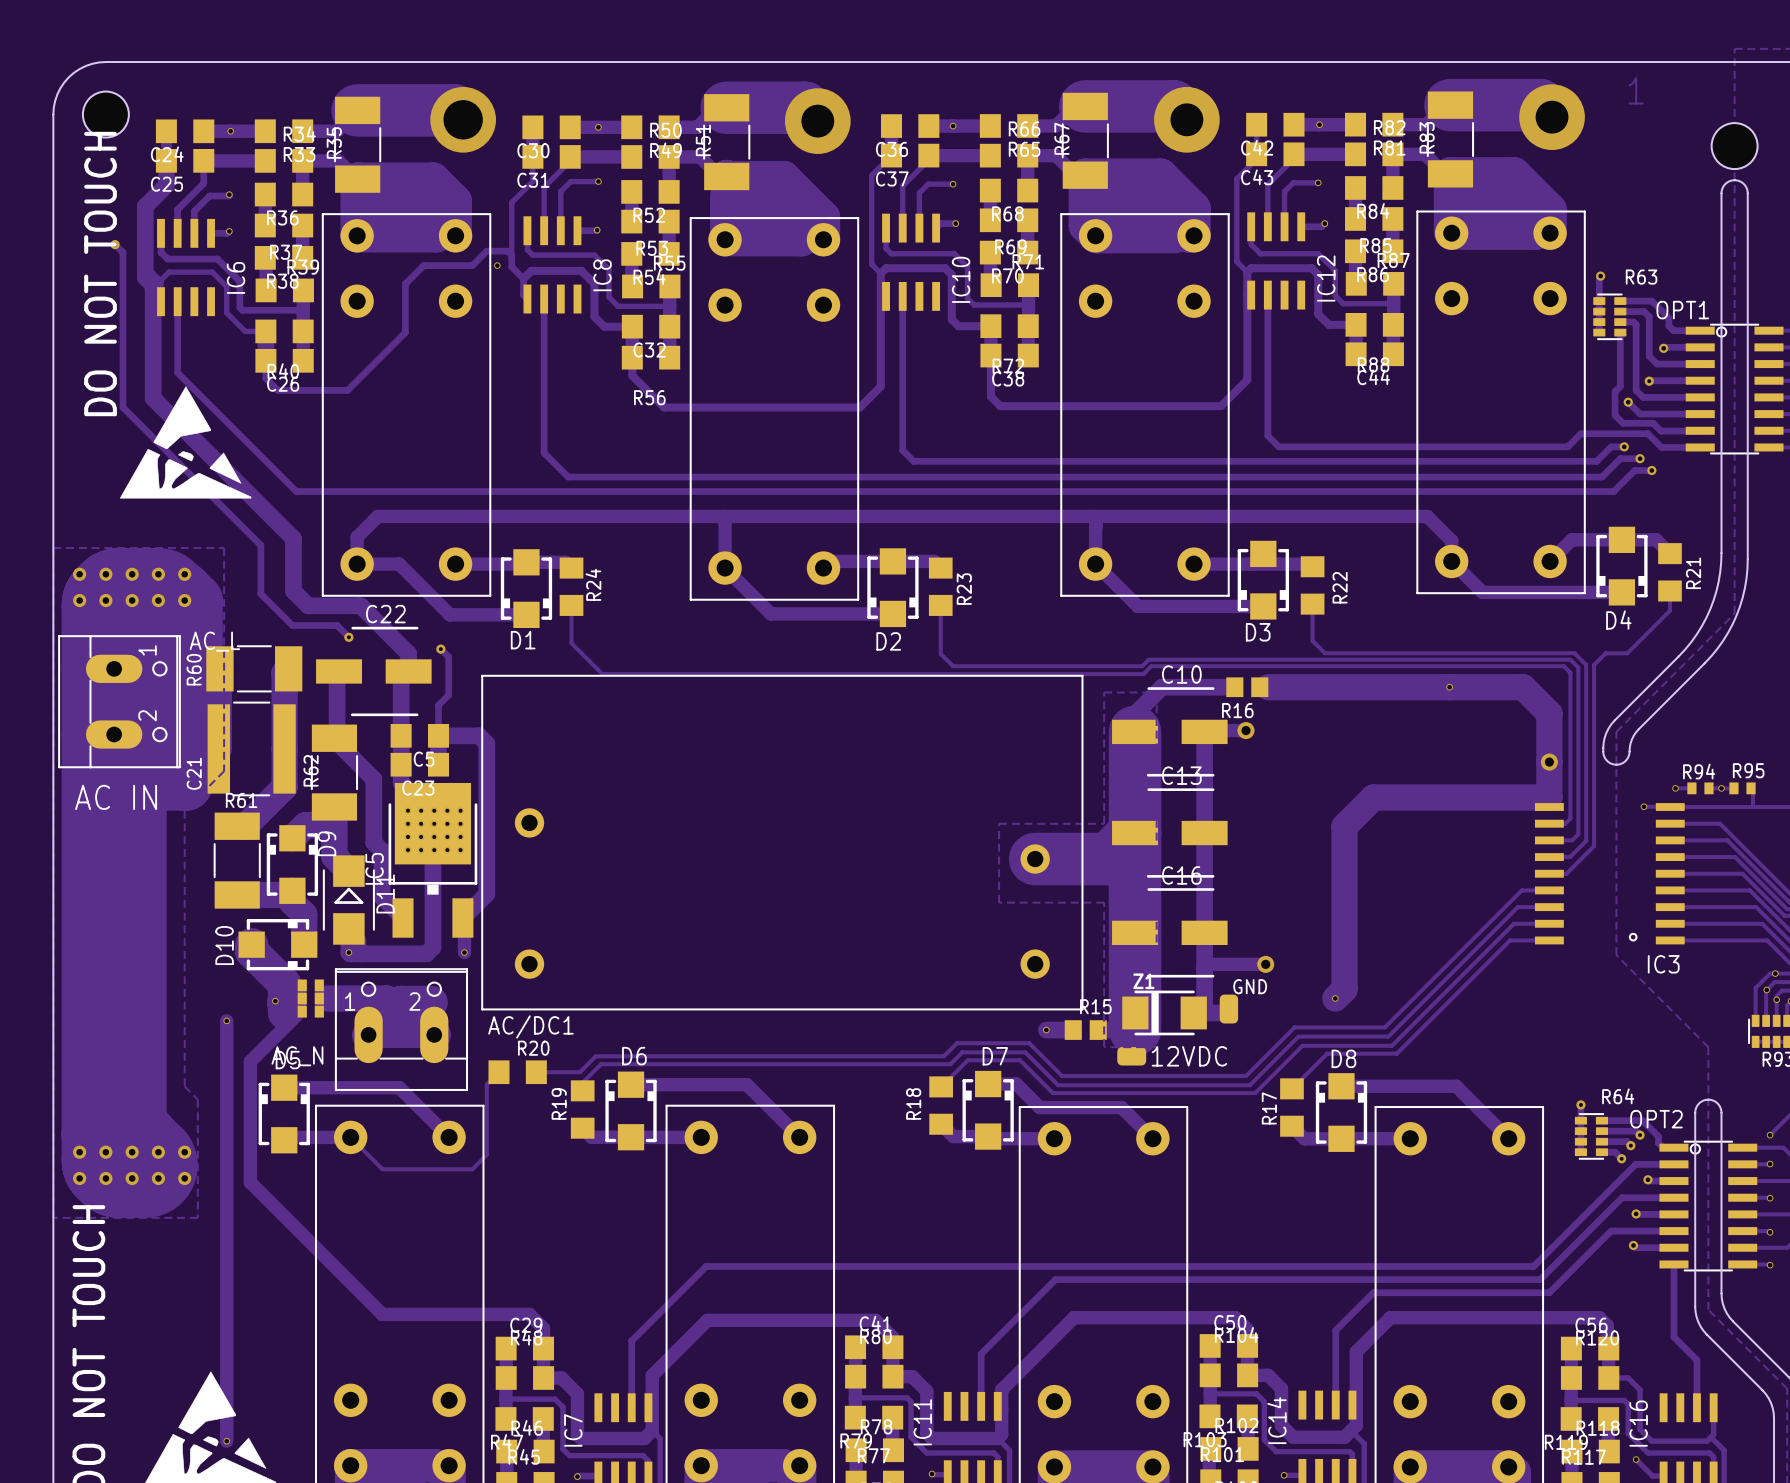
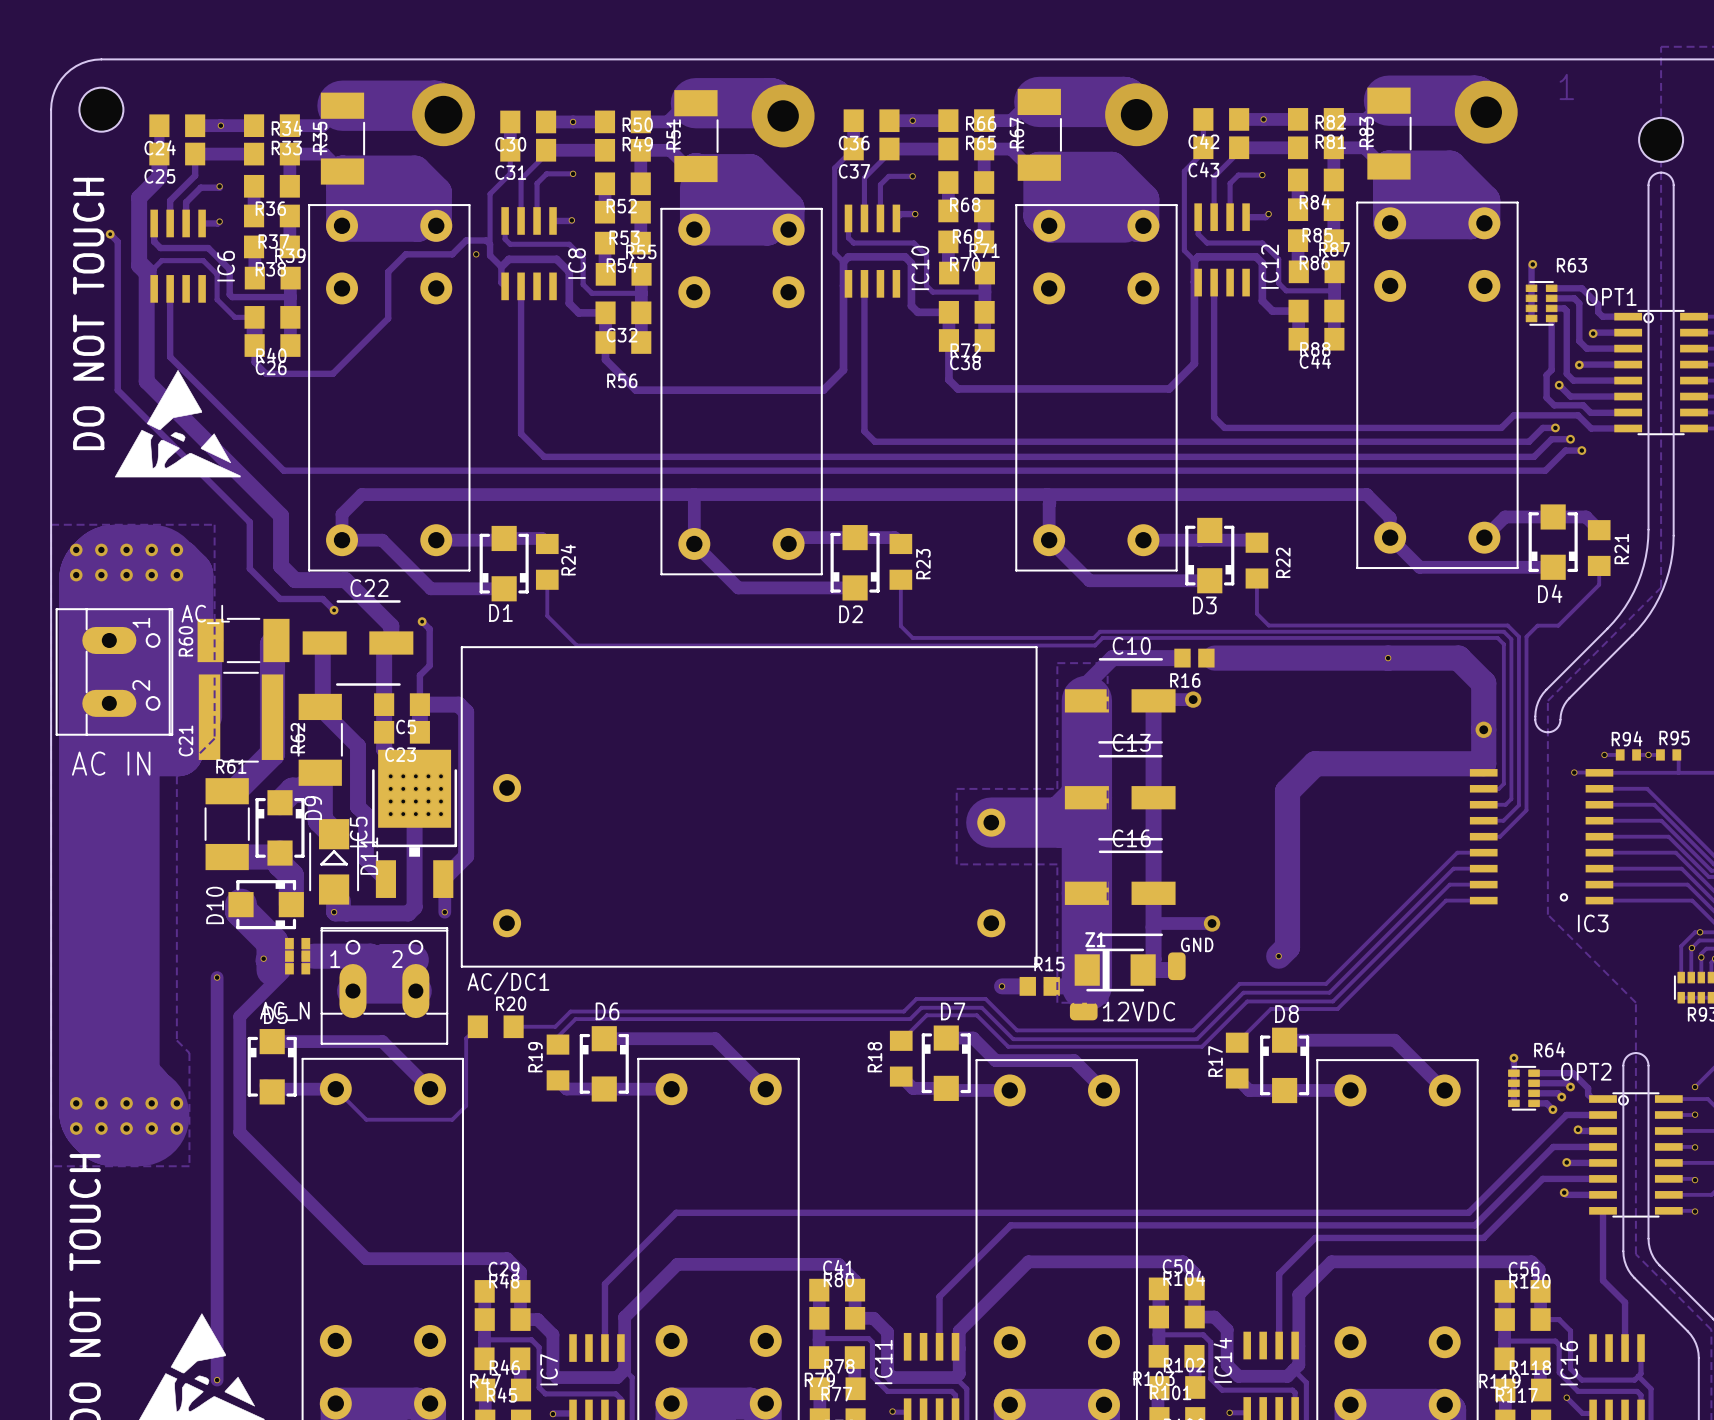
text position: DO NOT TOUCH (100, 274) -> DO NOT TOUCH (88, 313)

